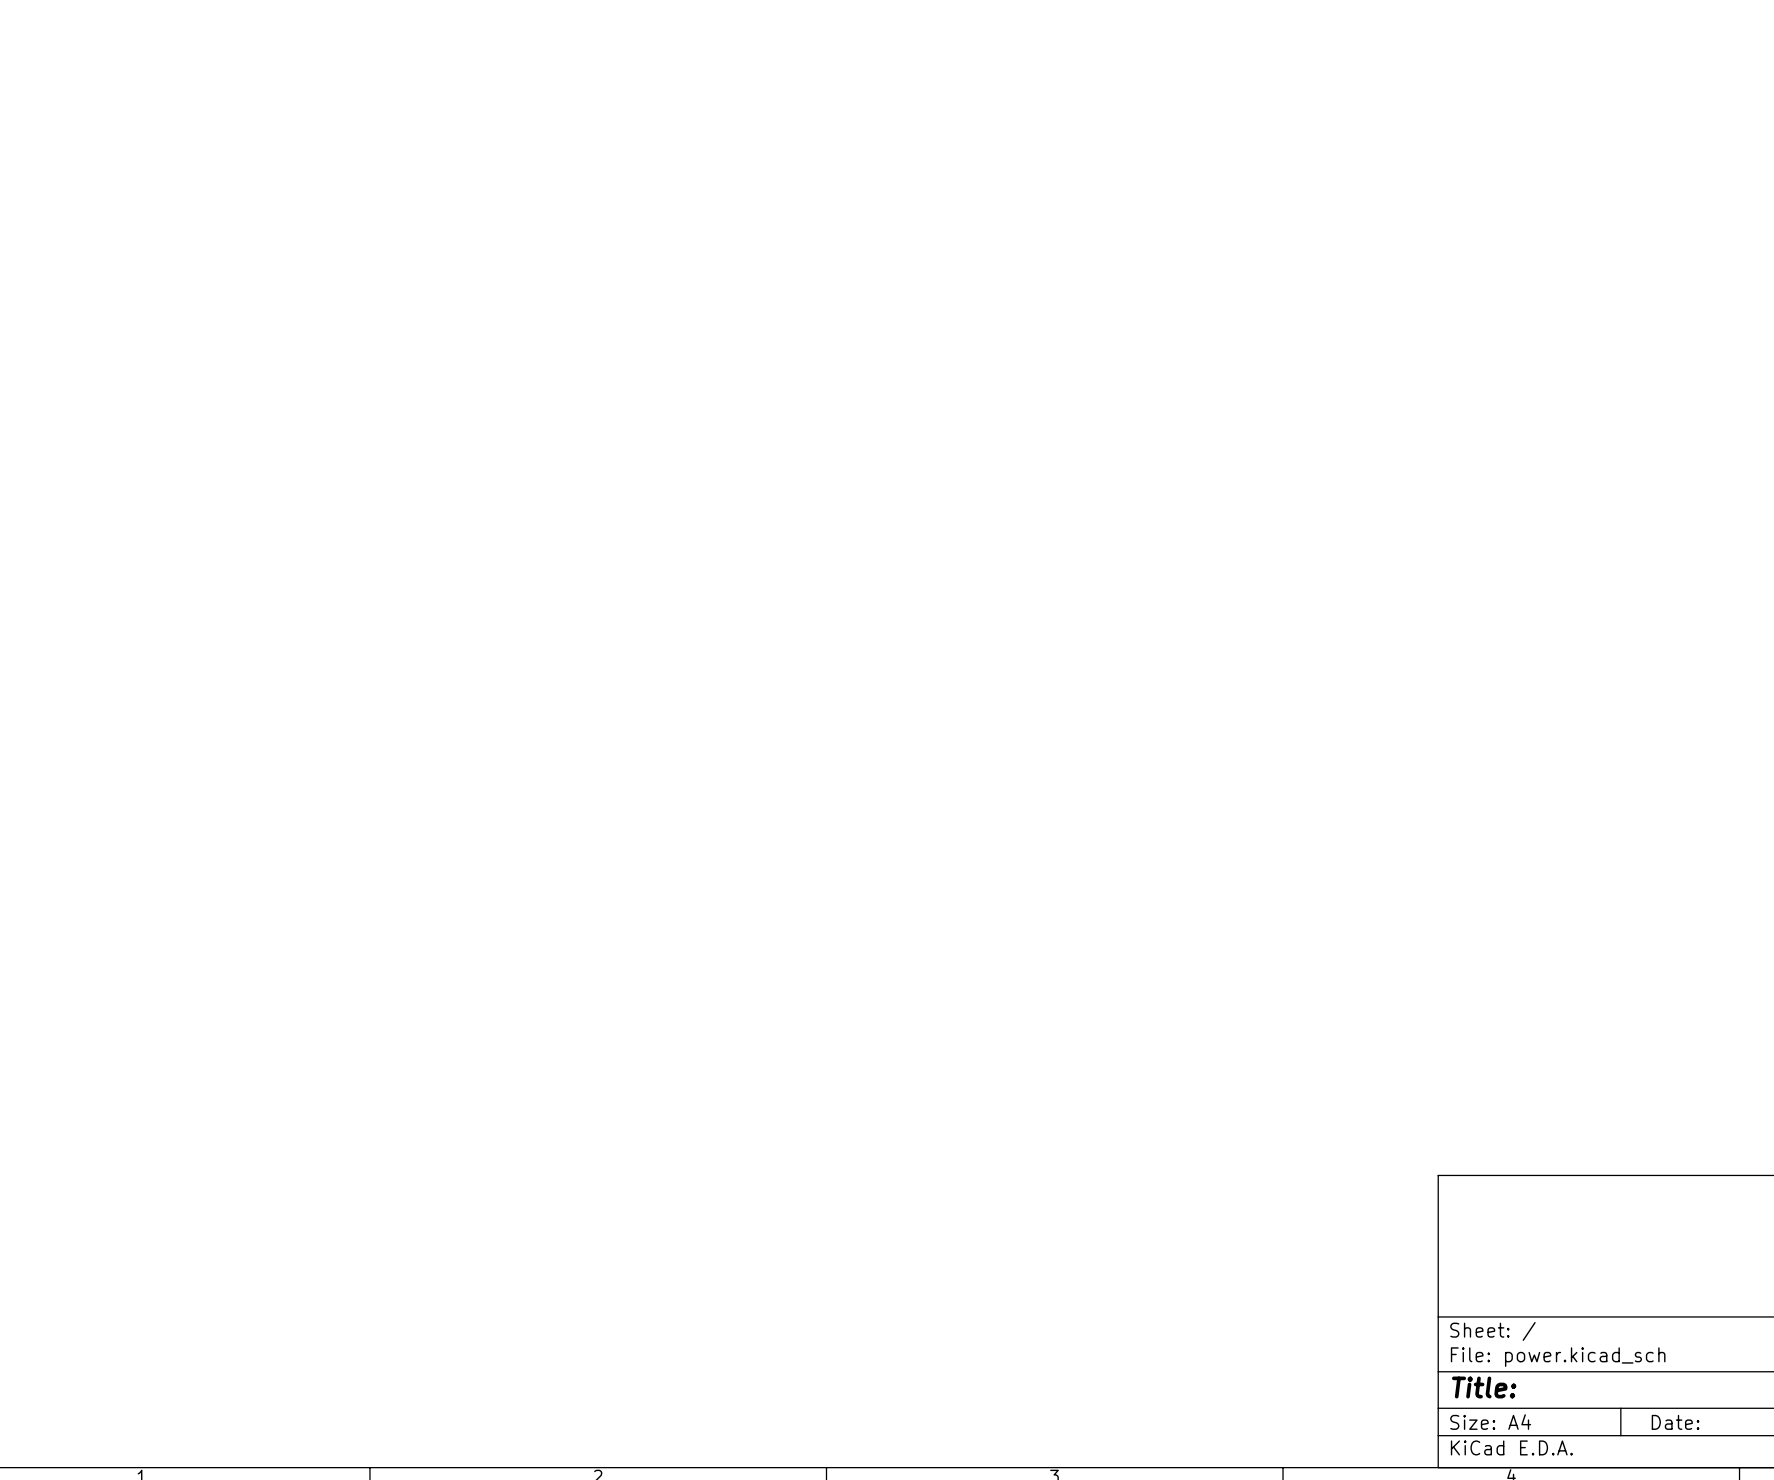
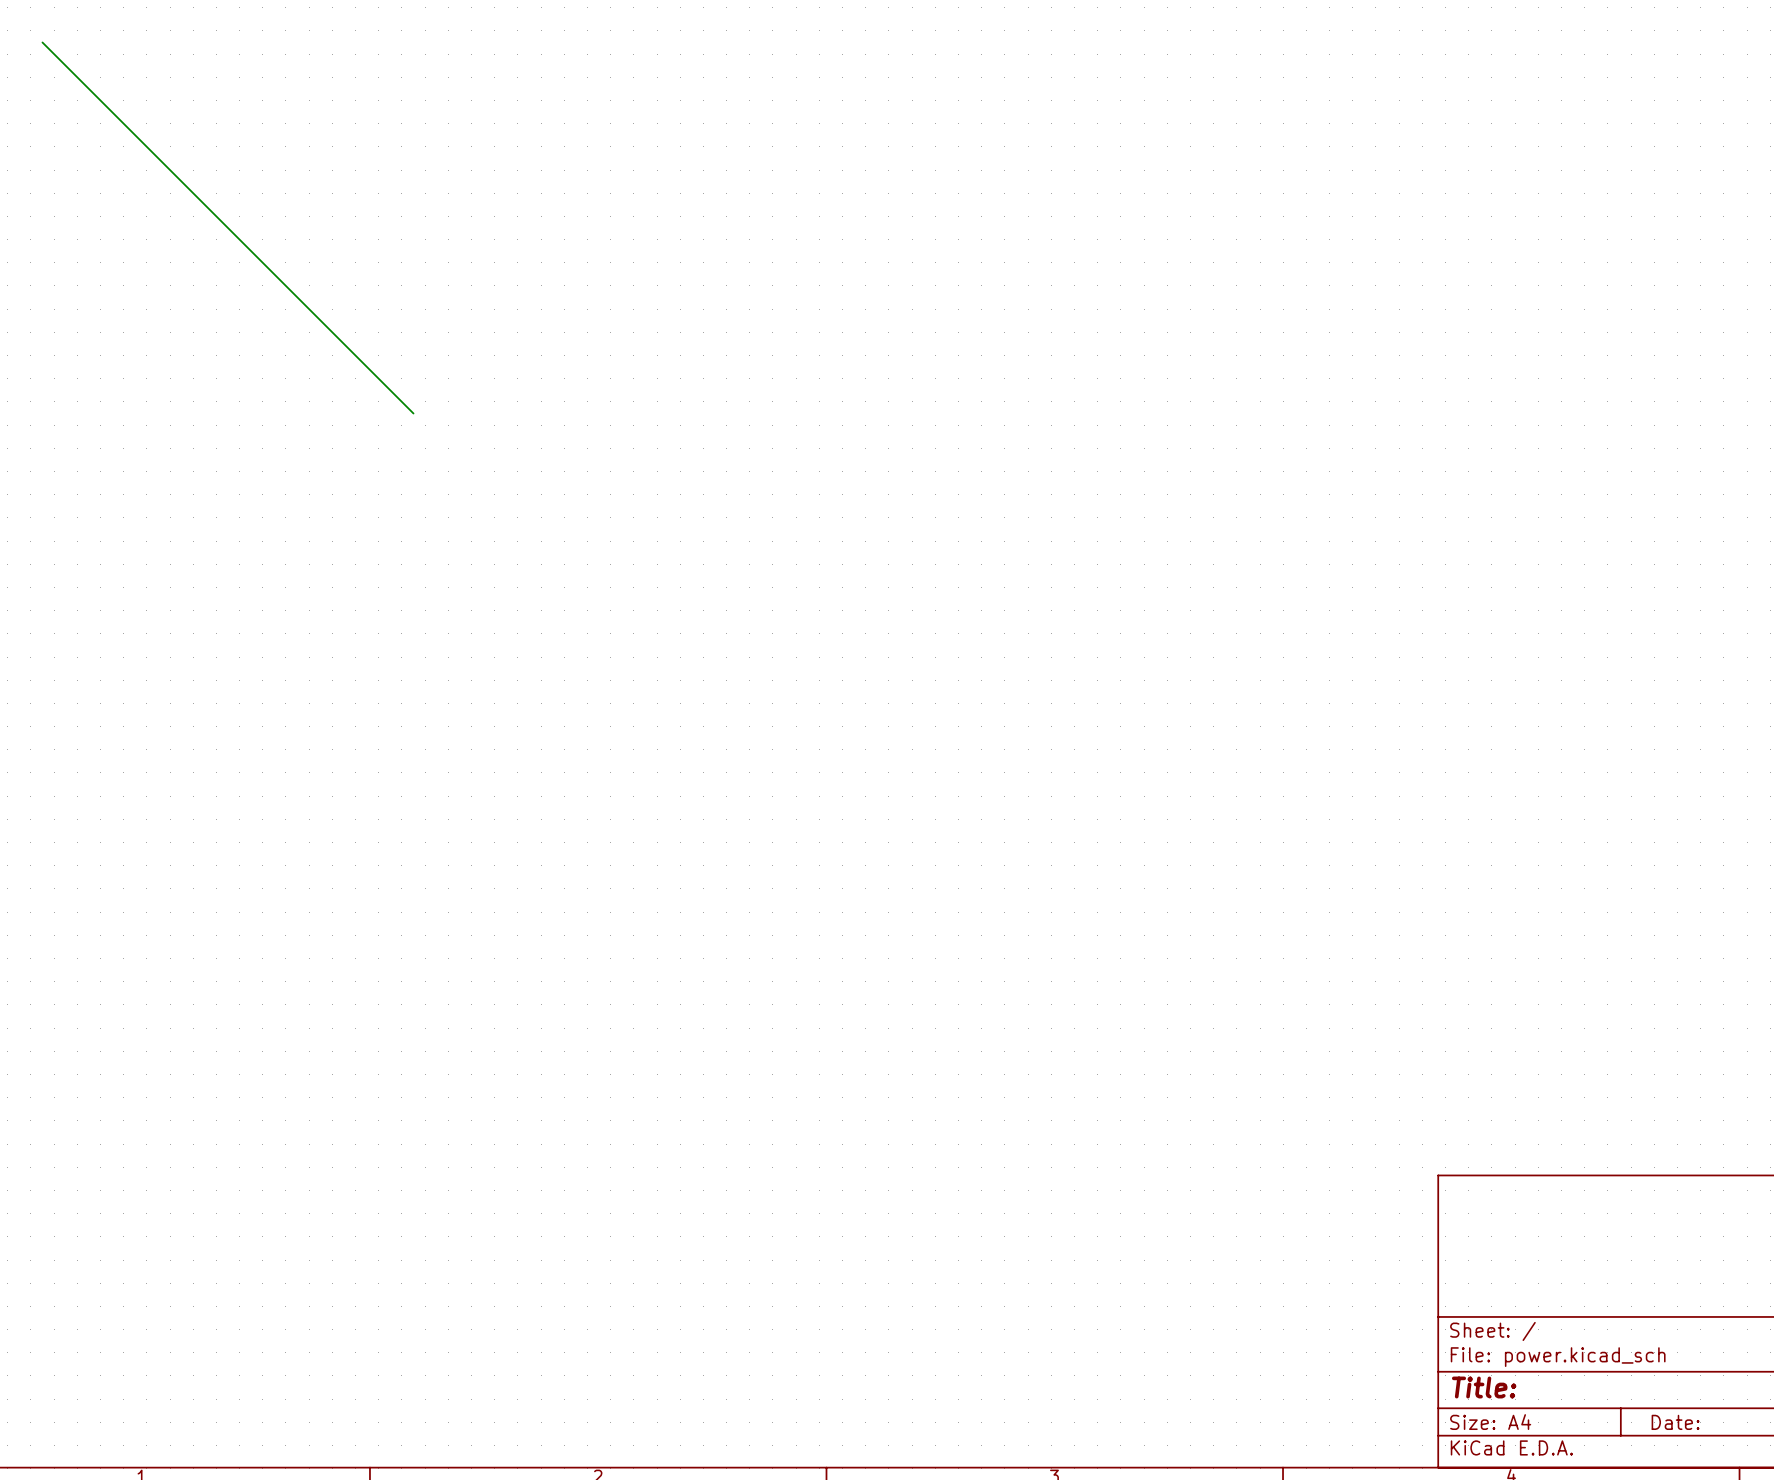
wire: none -> (42, 42) (413, 413)

